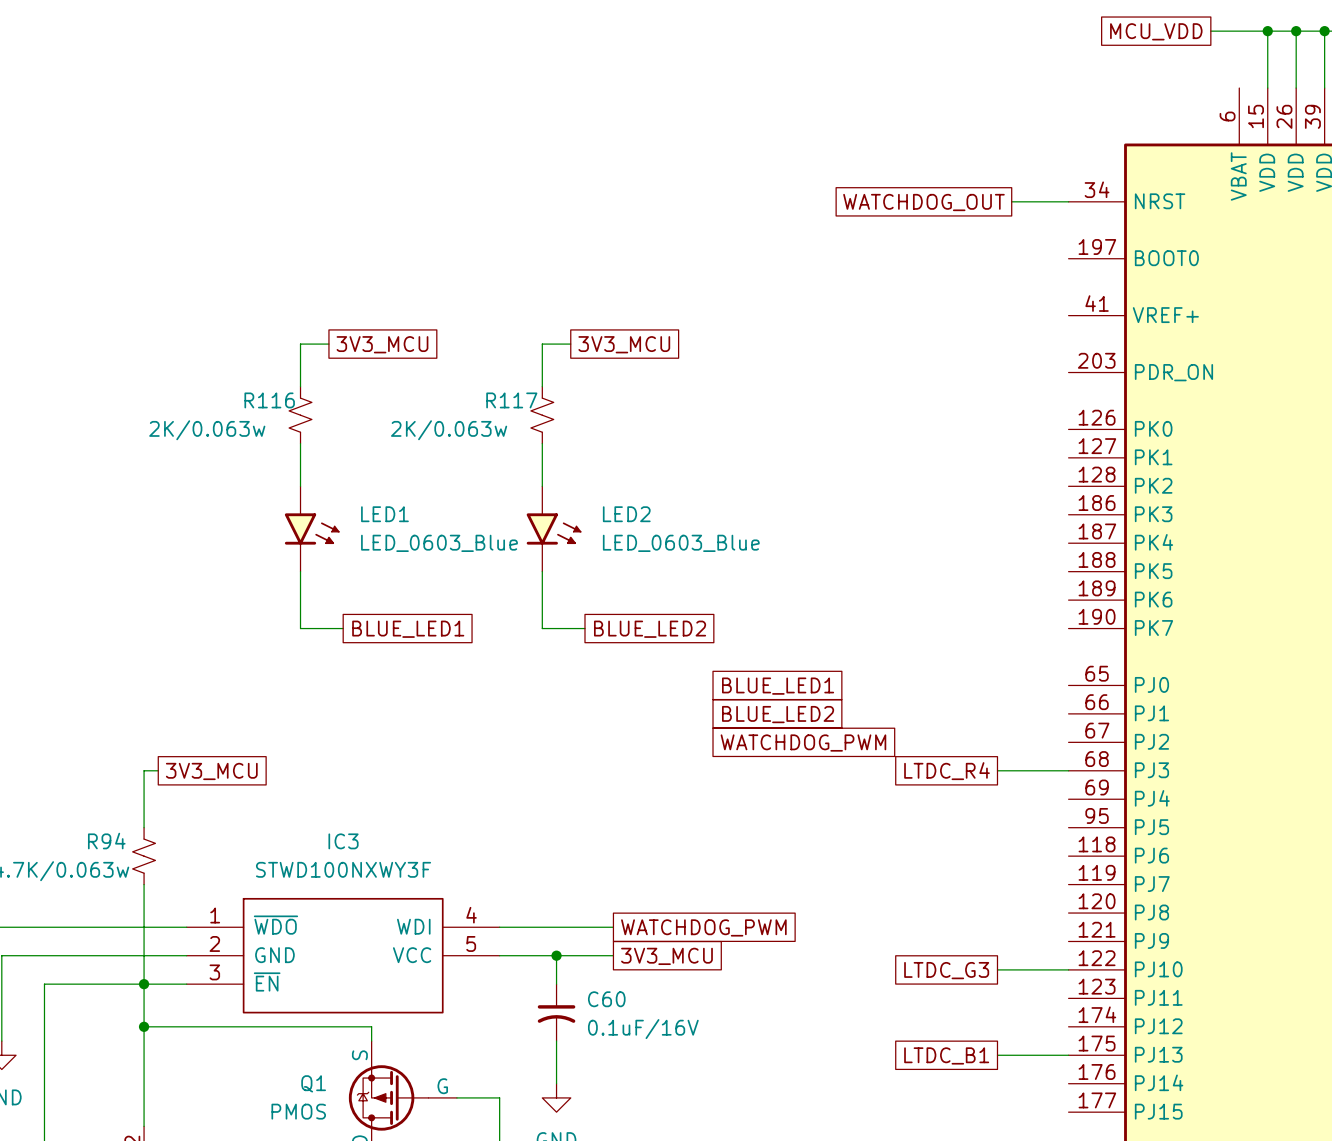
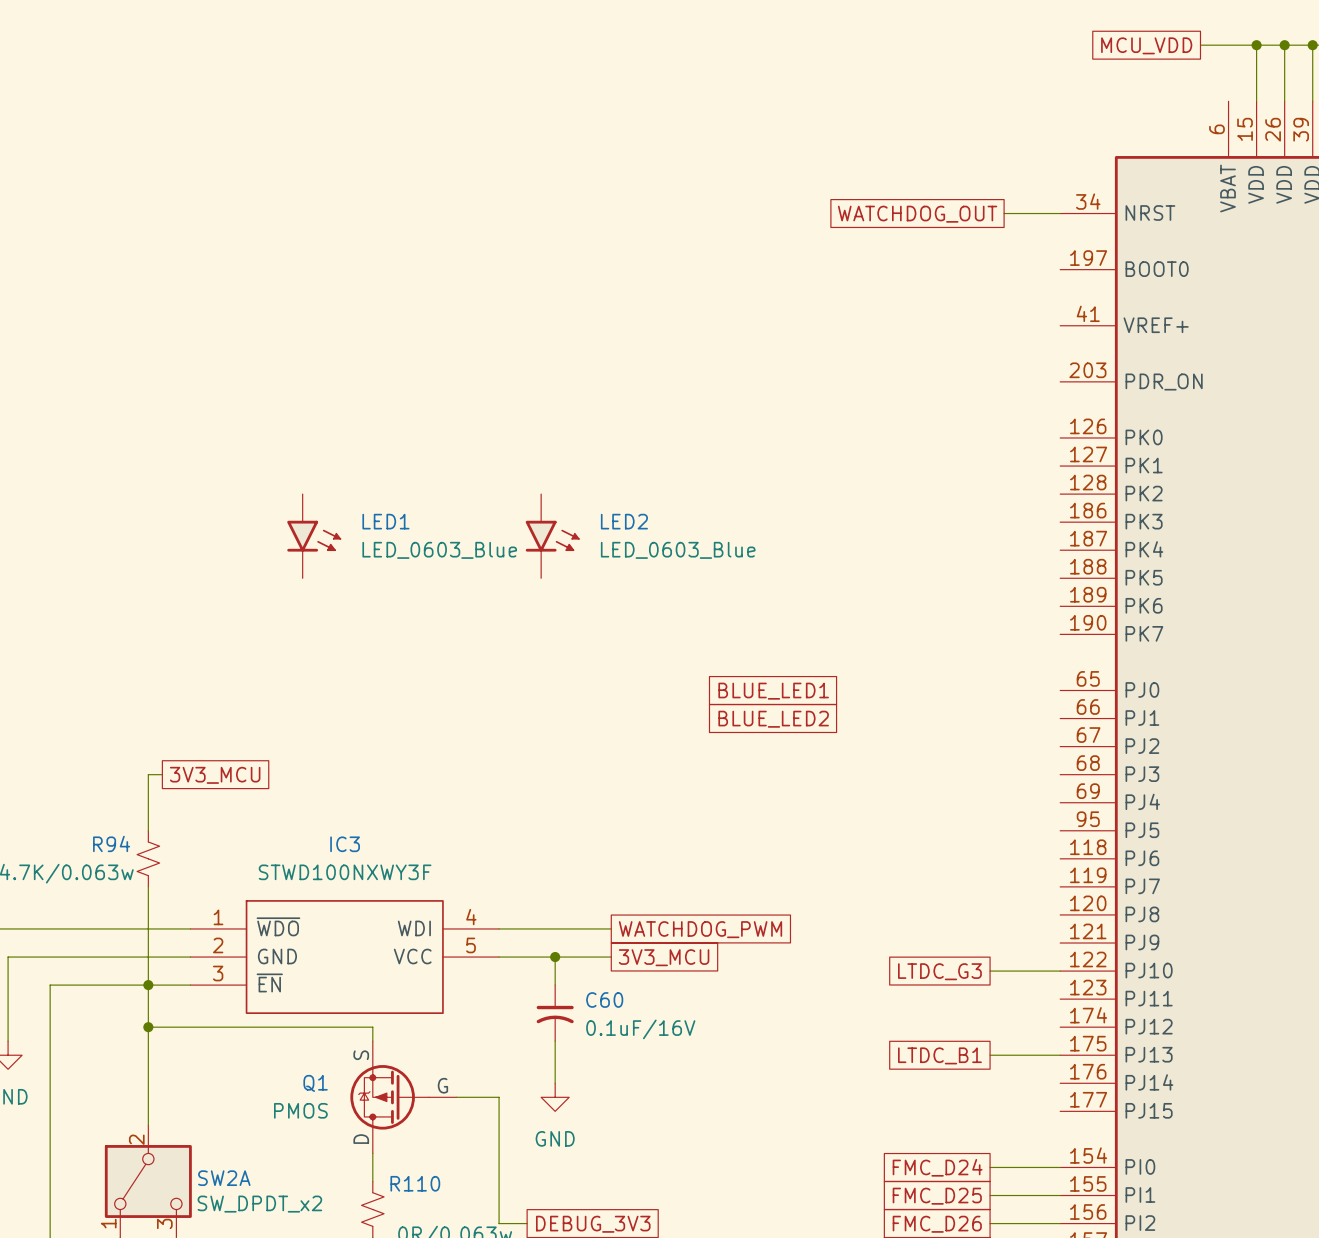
wire: (328, 344) (300, 344) (300, 386) -> none
global label: 3V3_MCU (382, 344) -> none
wire: (570, 344) (542, 344) (542, 386) -> none
global label: 3V3_MCU (624, 344) -> none
R116: 2K/0.063w (300, 415) -> none
R117: 2K/0.063w (542, 415) -> none
wire: (300, 443) (300, 486) -> none
wire: (542, 443) (542, 486) -> none
wire: (300, 571) (300, 628) (343, 628) -> none
wire: (542, 571) (542, 628) (584, 628) -> none
global label: BLUE_LED1 (408, 629) -> none
global label: BLUE_LED2 (650, 629) -> none
global label: WATCHDOG_PWM (803, 743) -> none
wire: (997, 770) (1068, 770) -> none
global label: LTDC_R4 (947, 771) -> none

